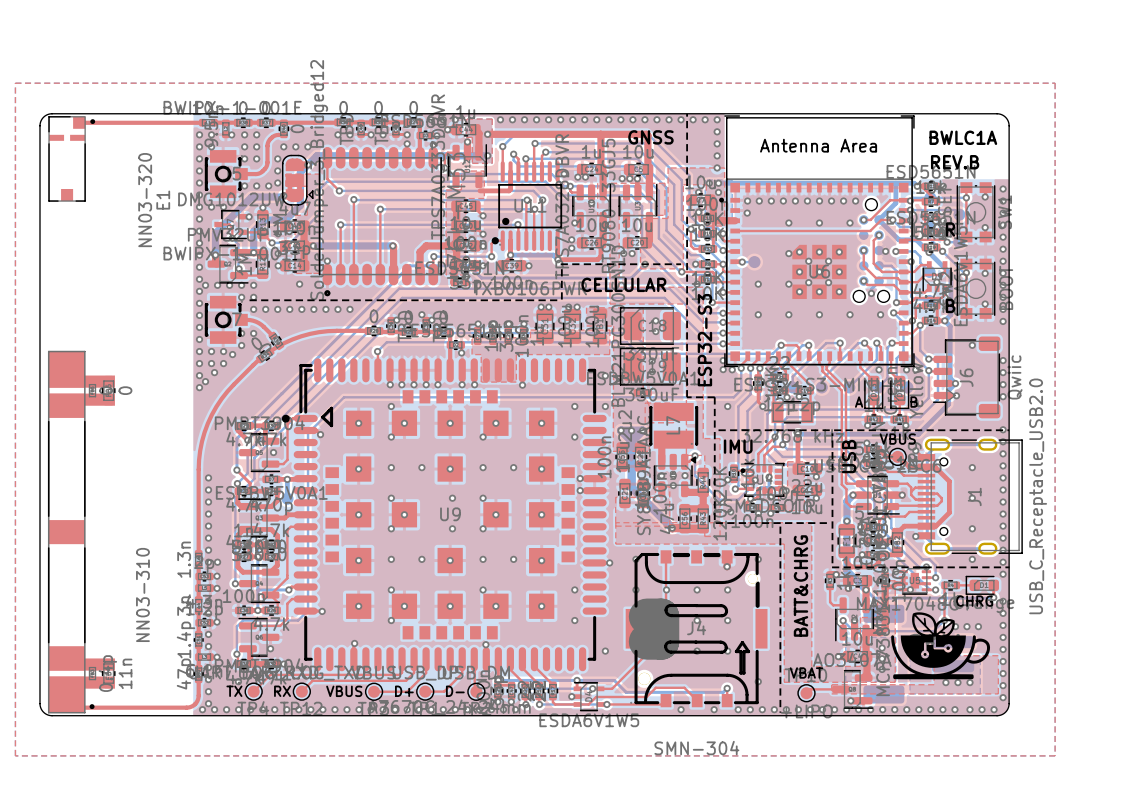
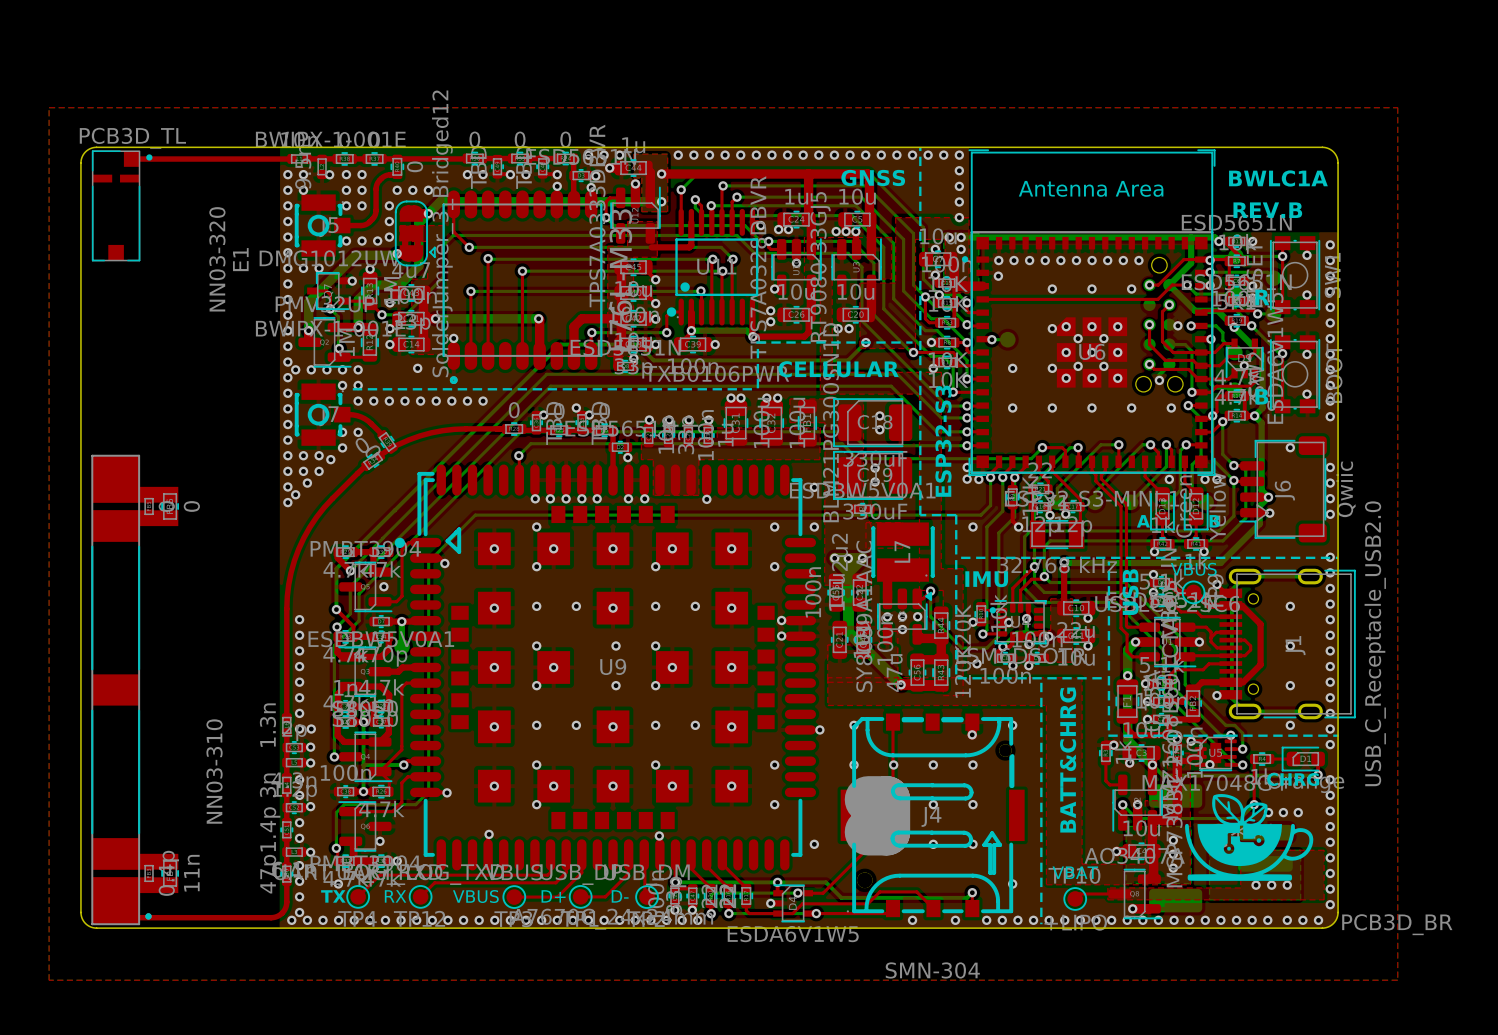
text: none -> PCB3D_TL (132, 138)
text: none -> PCB3D_BR (1397, 924)

